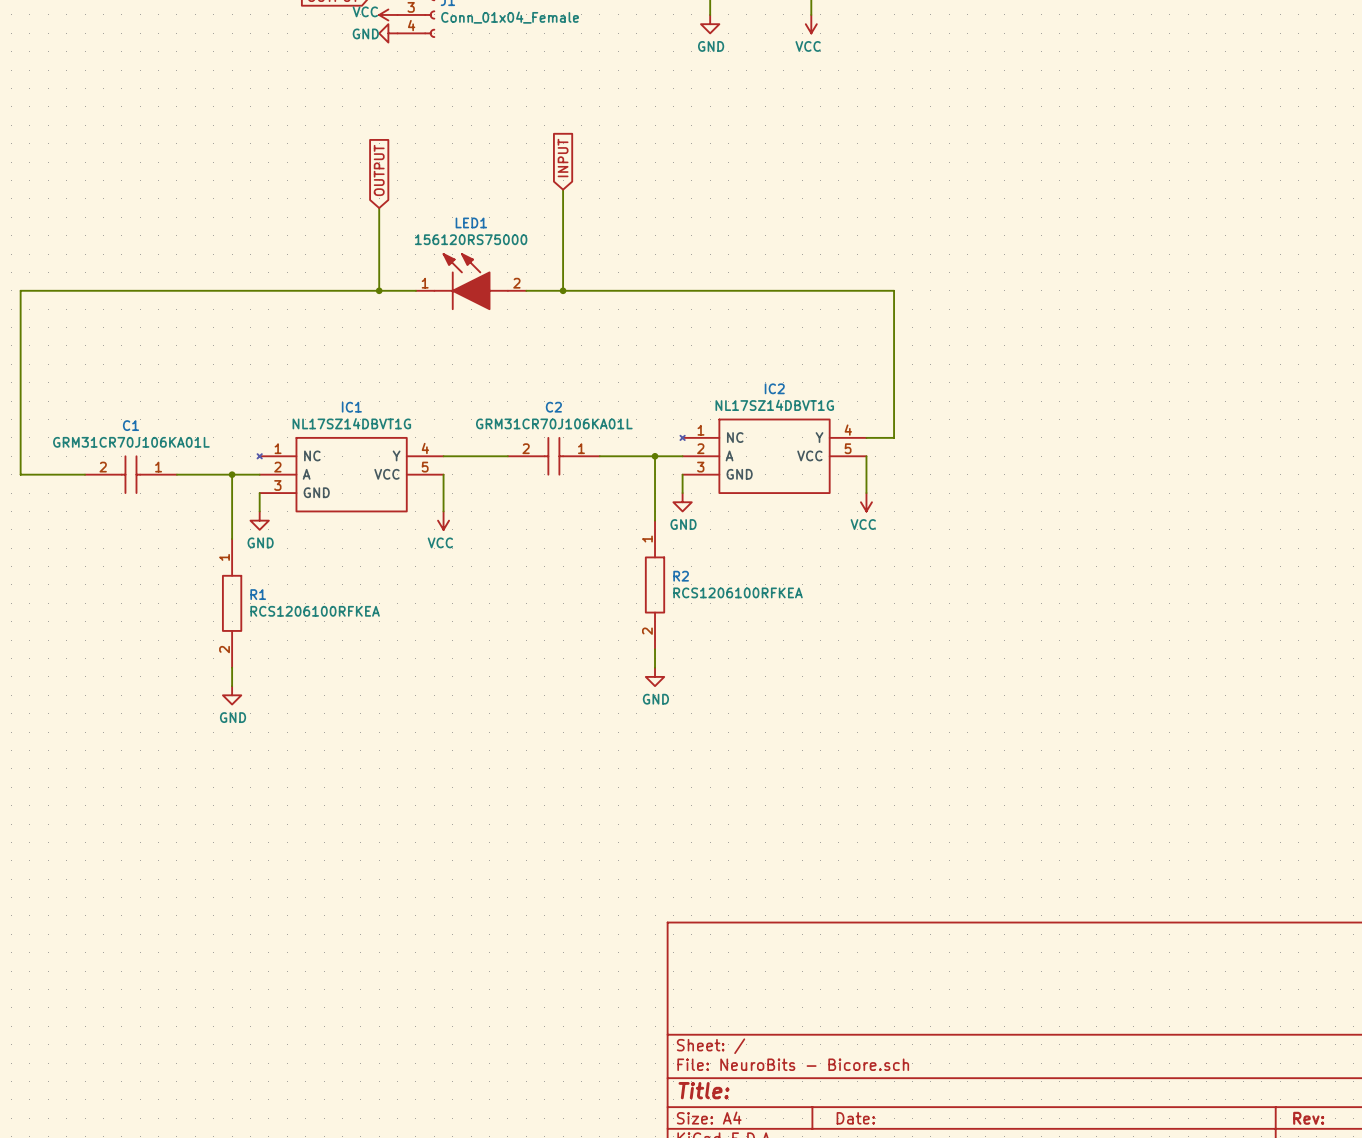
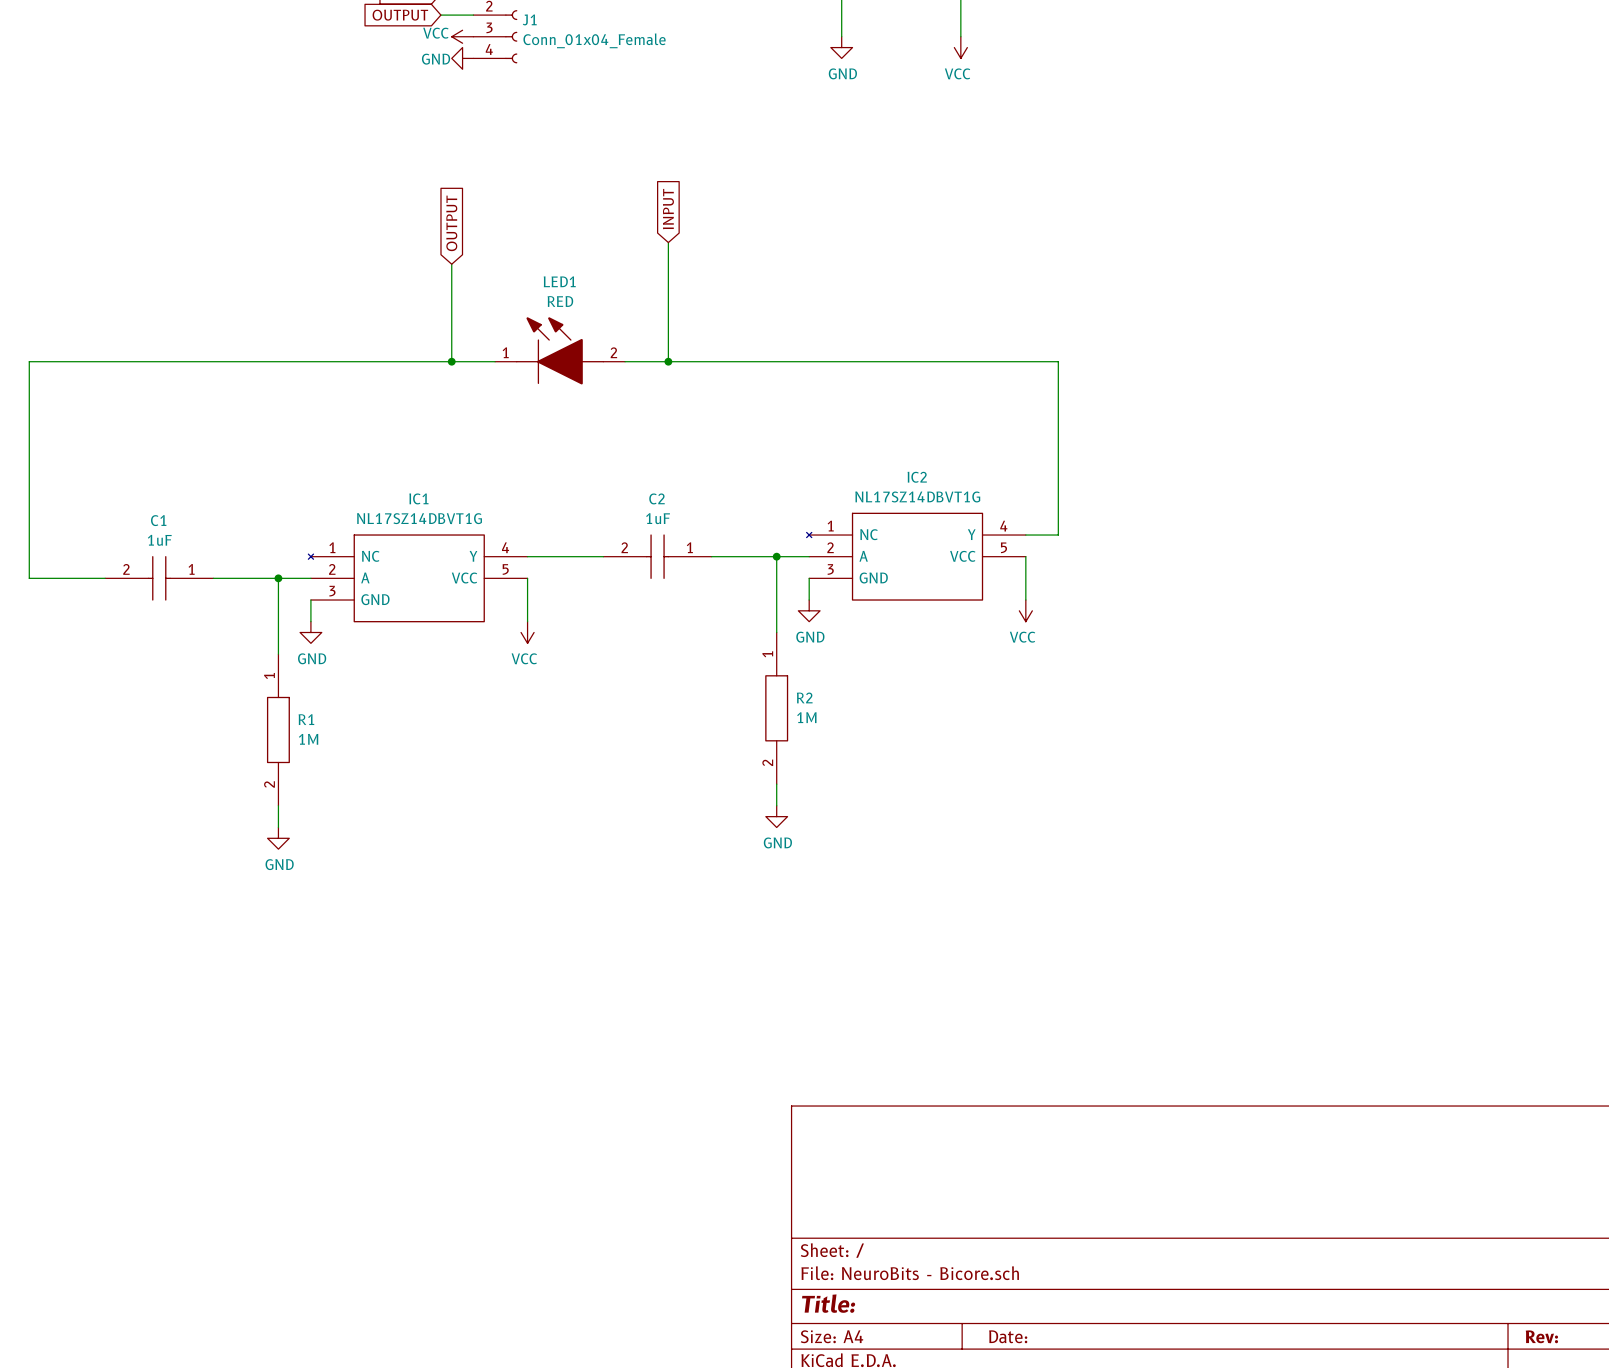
LED1 value: 156120RS75000 (471, 239) -> RED (560, 301)
C2 value: GRM31CR70J106KA01L (554, 423) -> 1uF (658, 518)
C1 value: GRM31CR70J106KA01L (131, 442) -> 1uF (159, 540)
R2 value: RCS1206100RFKEA (738, 592) -> 1M (806, 717)
R1 value: RCS1206100RFKEA (315, 611) -> 1M (308, 739)

